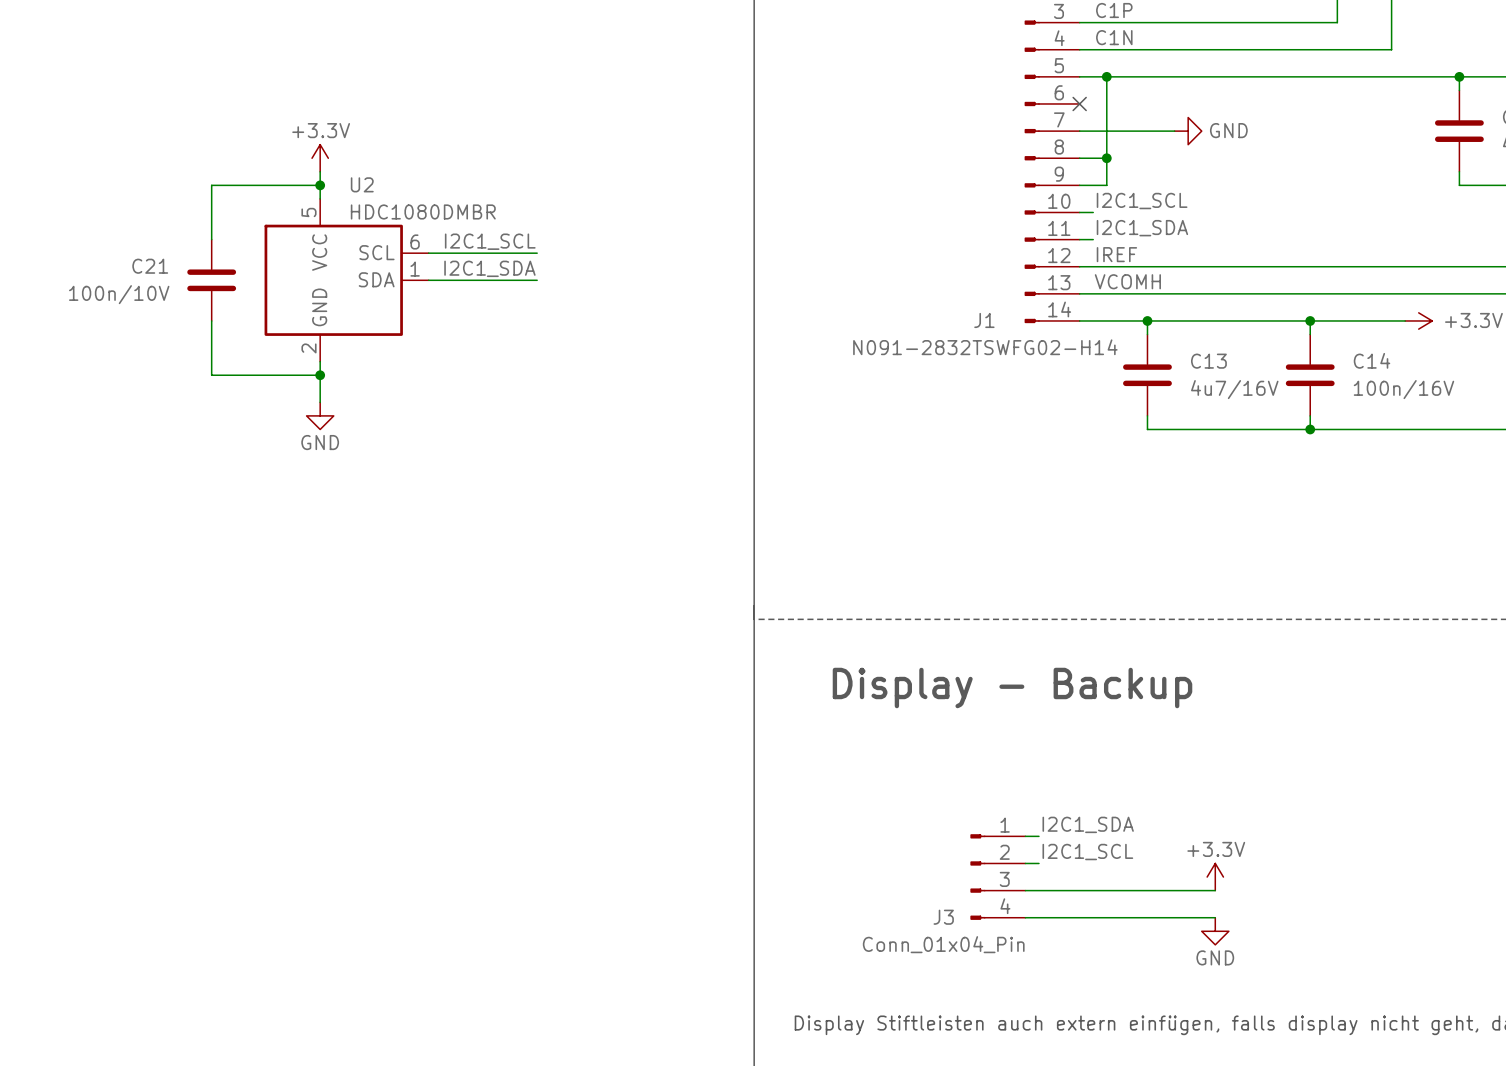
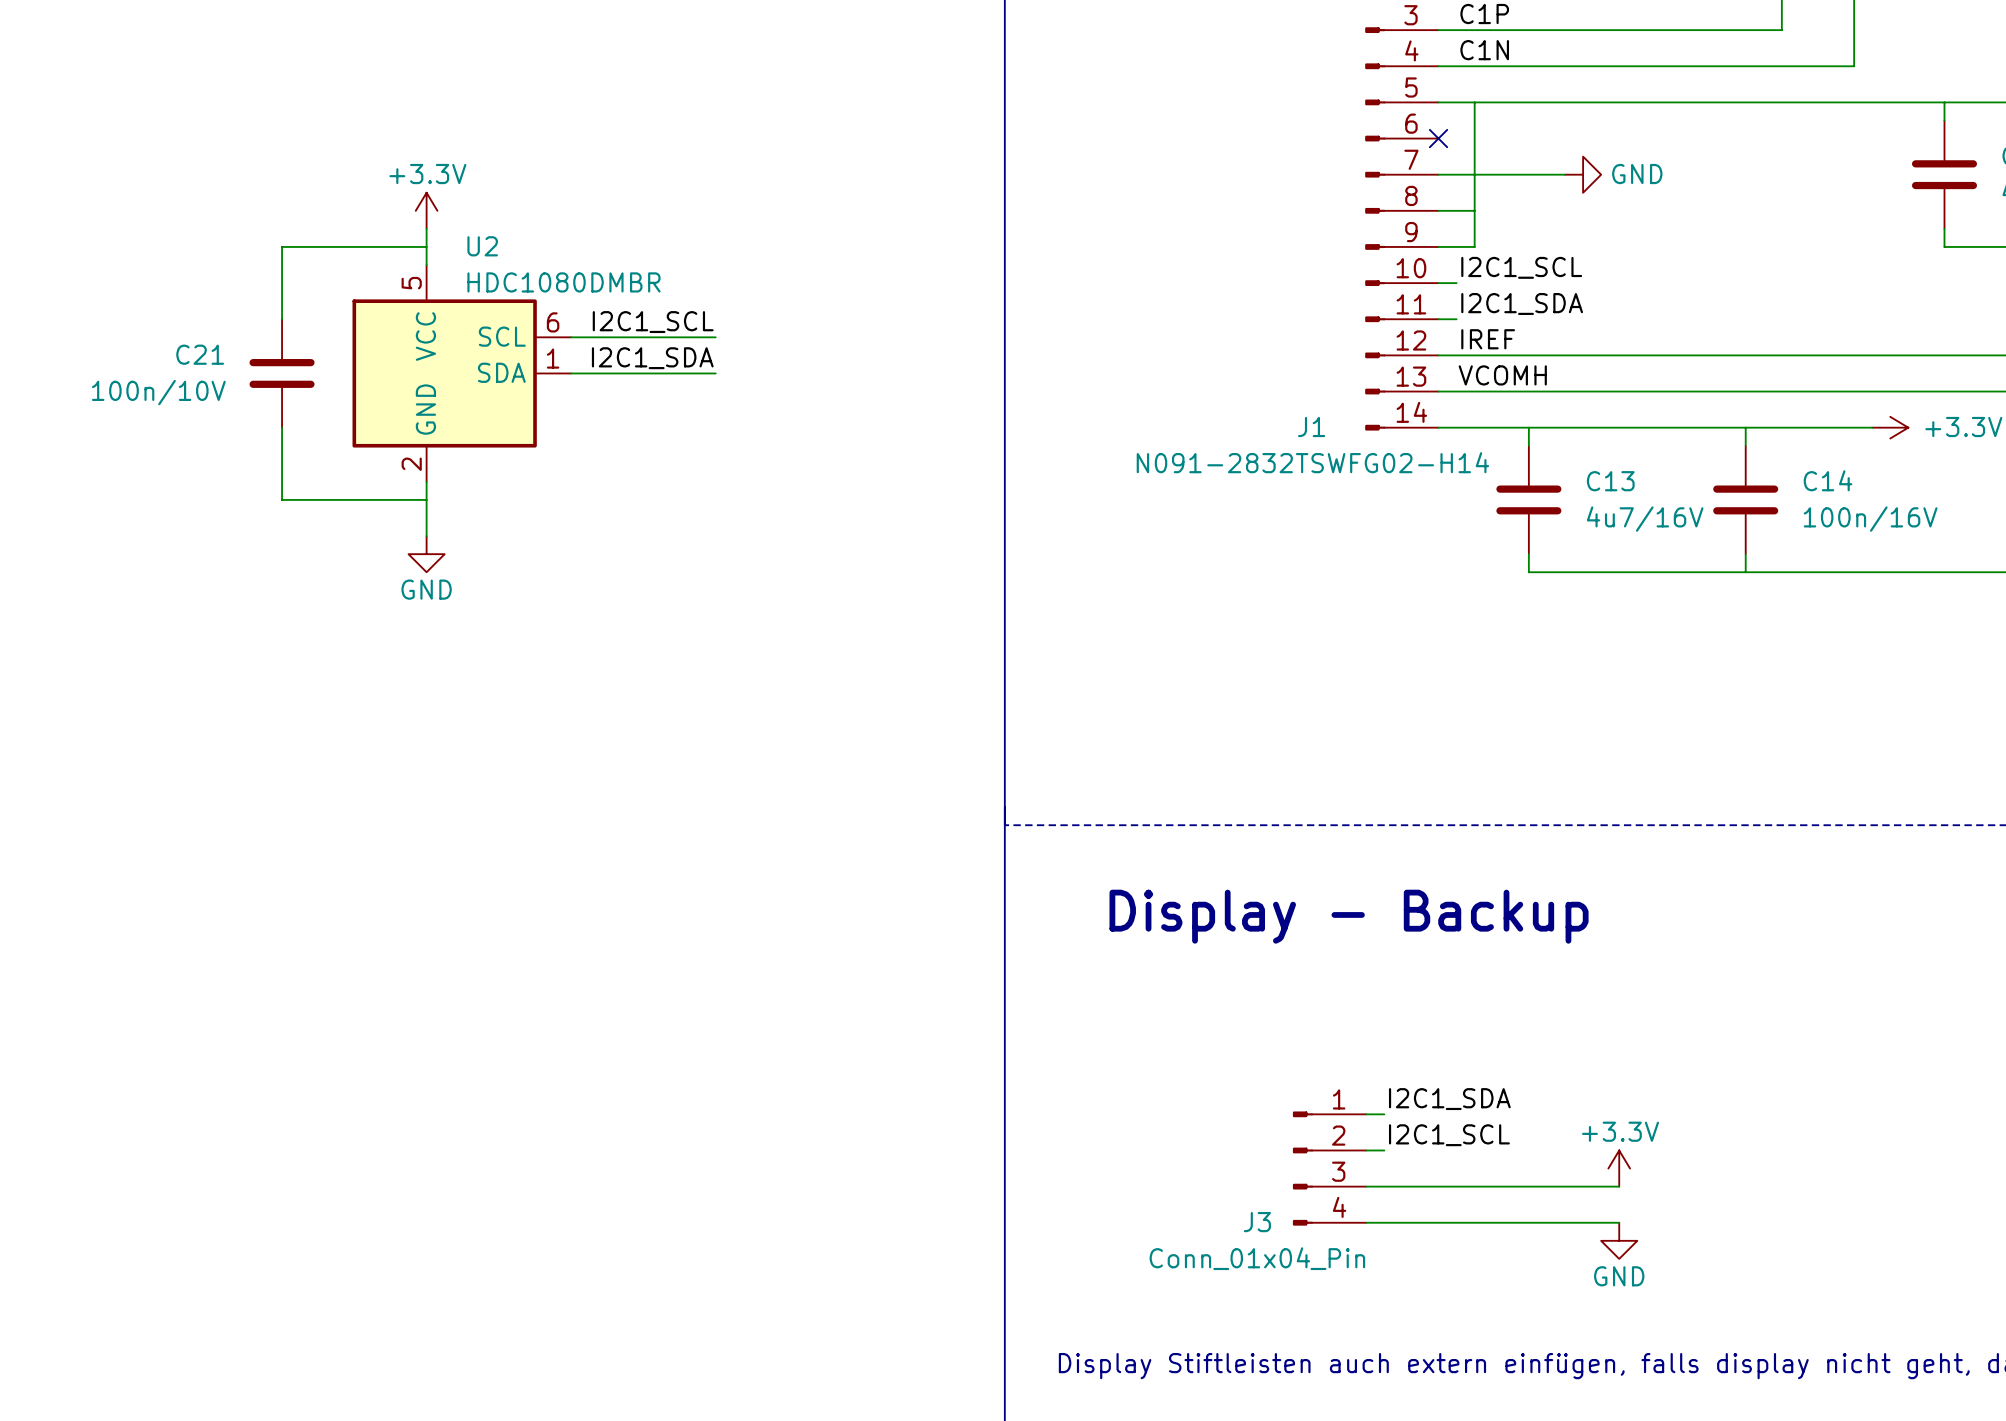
junction: (1106, 76) -> none
junction: (1459, 76) -> none
junction: (1106, 158) -> none
junction: (320, 185) -> none
junction: (1147, 320) -> none
junction: (1310, 320) -> none
junction: (320, 375) -> none
junction: (1310, 429) -> none

